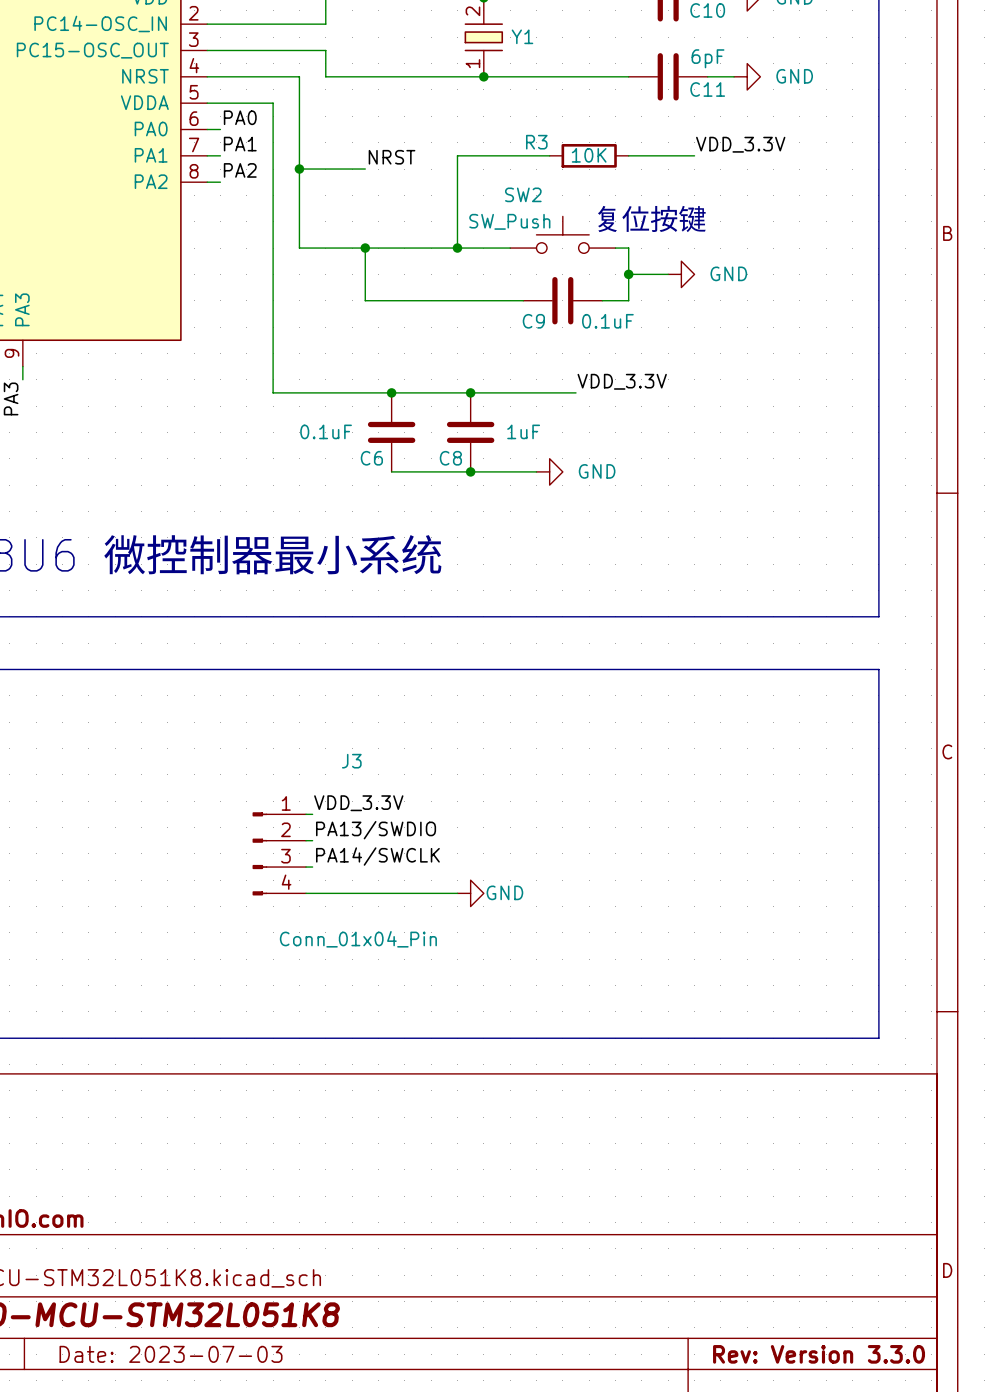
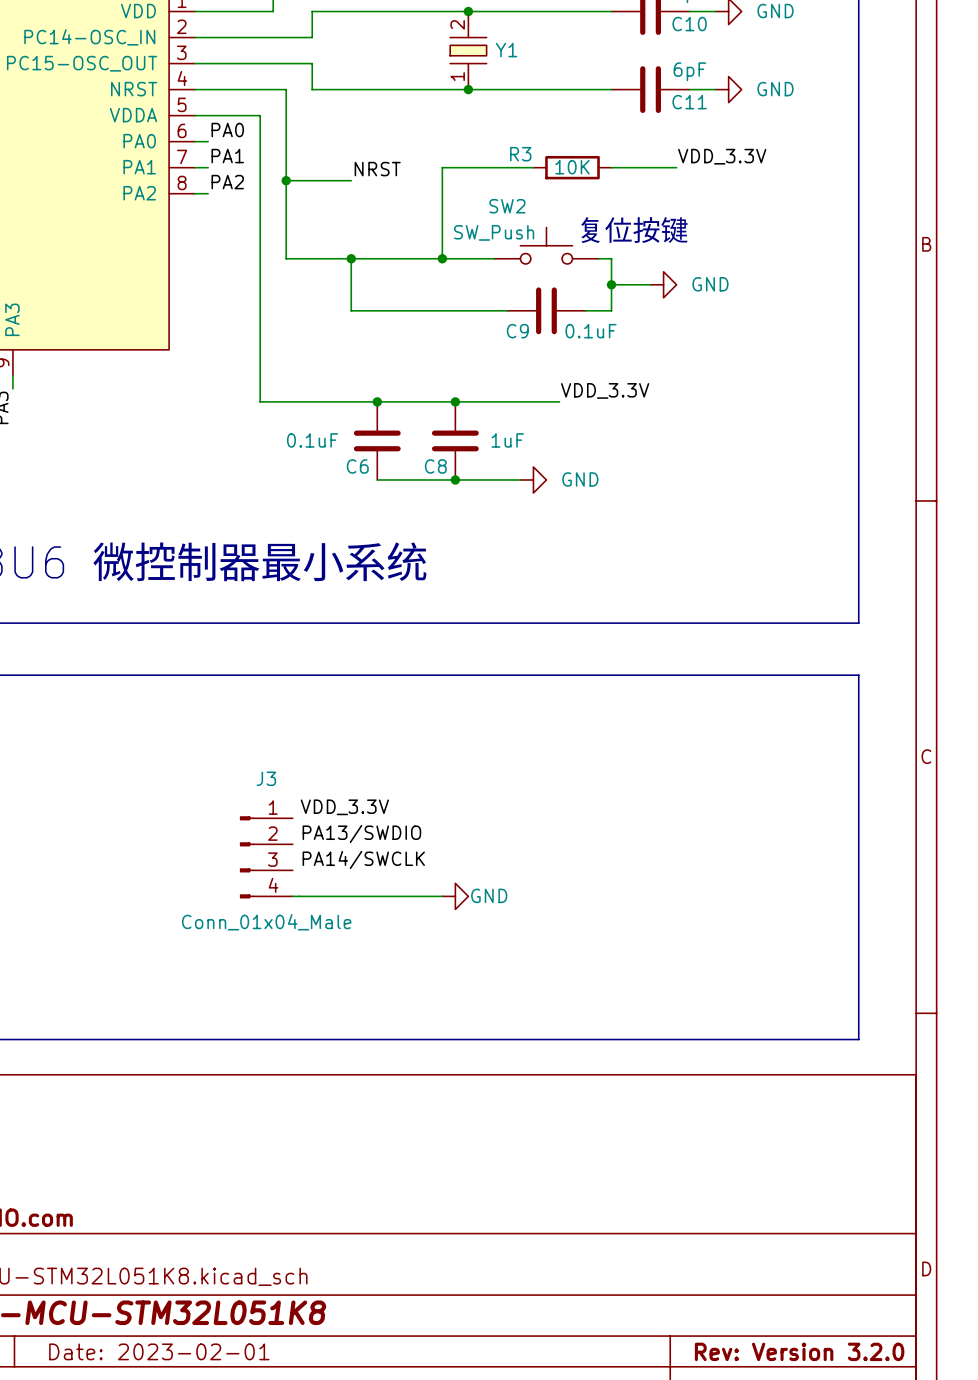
J3 name position: J3 (351, 761) -> J3 (266, 778)
wire: (306, 814) (312, 814) -> none
wire: (306, 840) (312, 840) -> none
wire: (306, 867) (312, 867) -> none
J3 value: Conn_01x04_Pin (358, 939) -> Conn_01x04_Male (266, 922)
title block: Date: 2023-07-03 (171, 1354) -> Date: 2023-02-01 (159, 1351)
title block: Rev: Version 3.3.0 (819, 1354) -> Rev: Version 3.2.0 (799, 1351)

